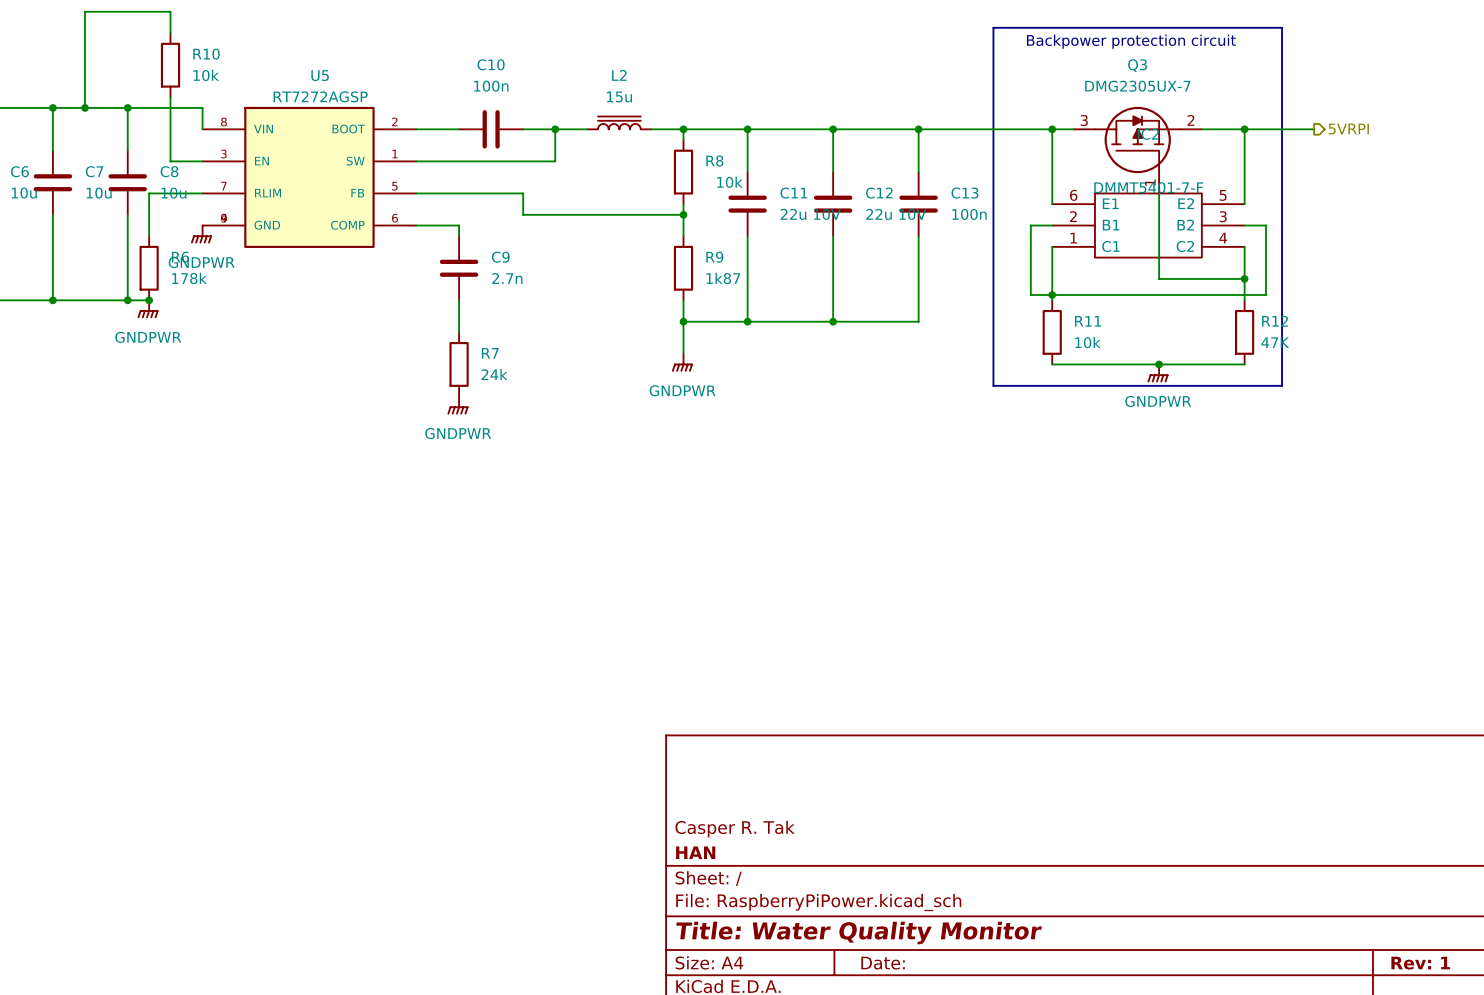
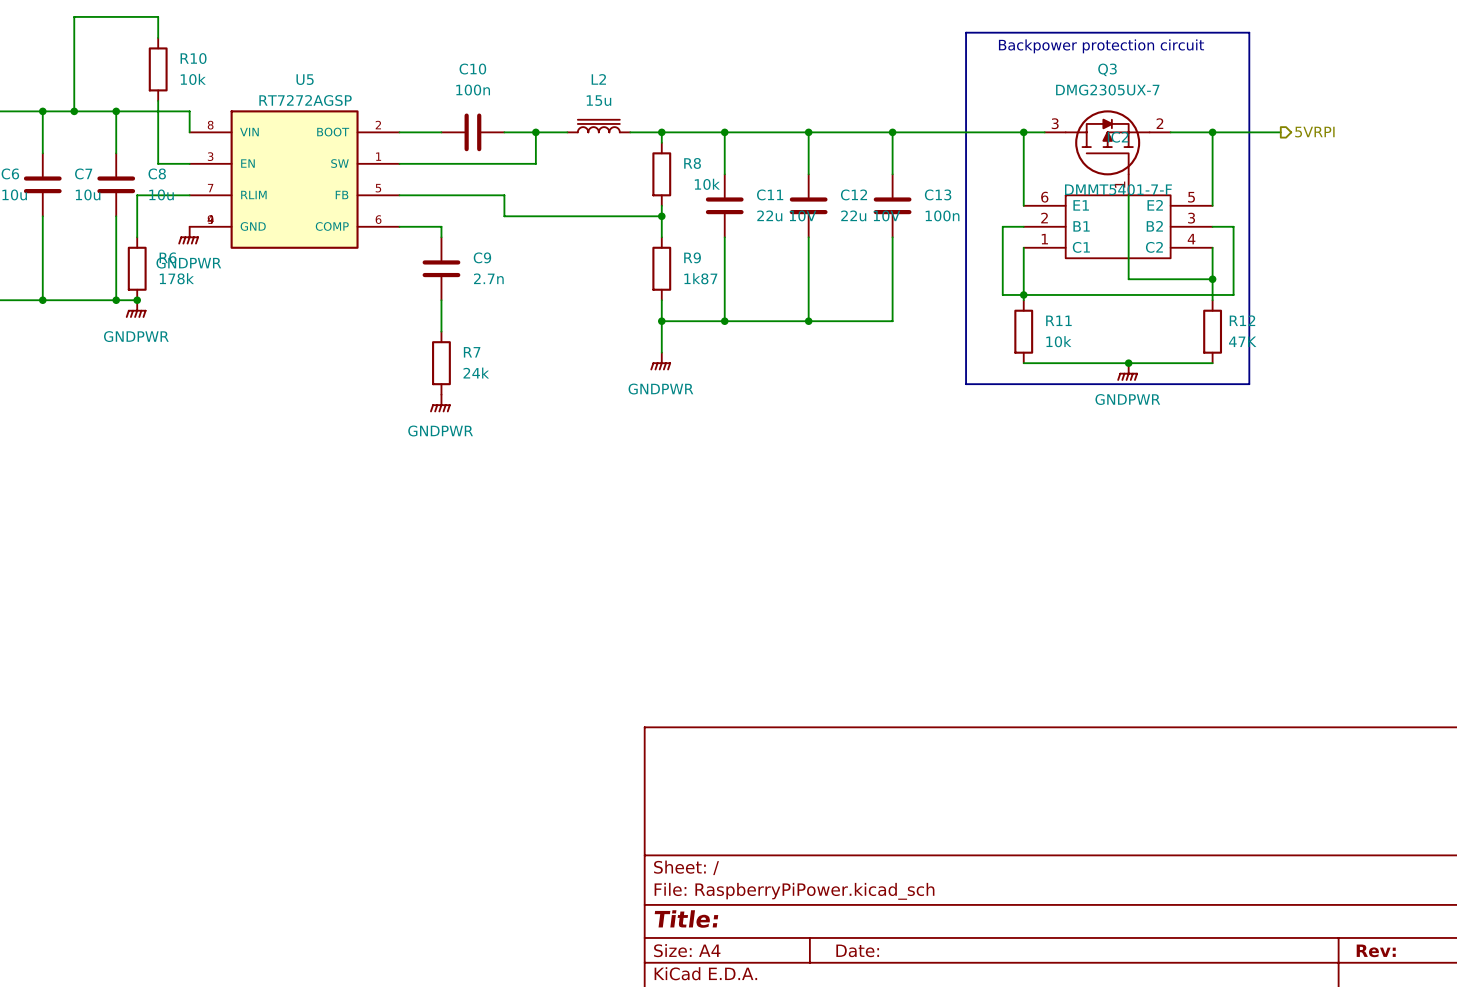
title block: Casper R. Tak (735, 829) -> none
title block: HAN (695, 852) -> none
title block: Title: Water Quality Monitor (859, 933) -> Title: (686, 919)
title block: Rev: 1 (1420, 963) -> Rev: (1376, 950)

